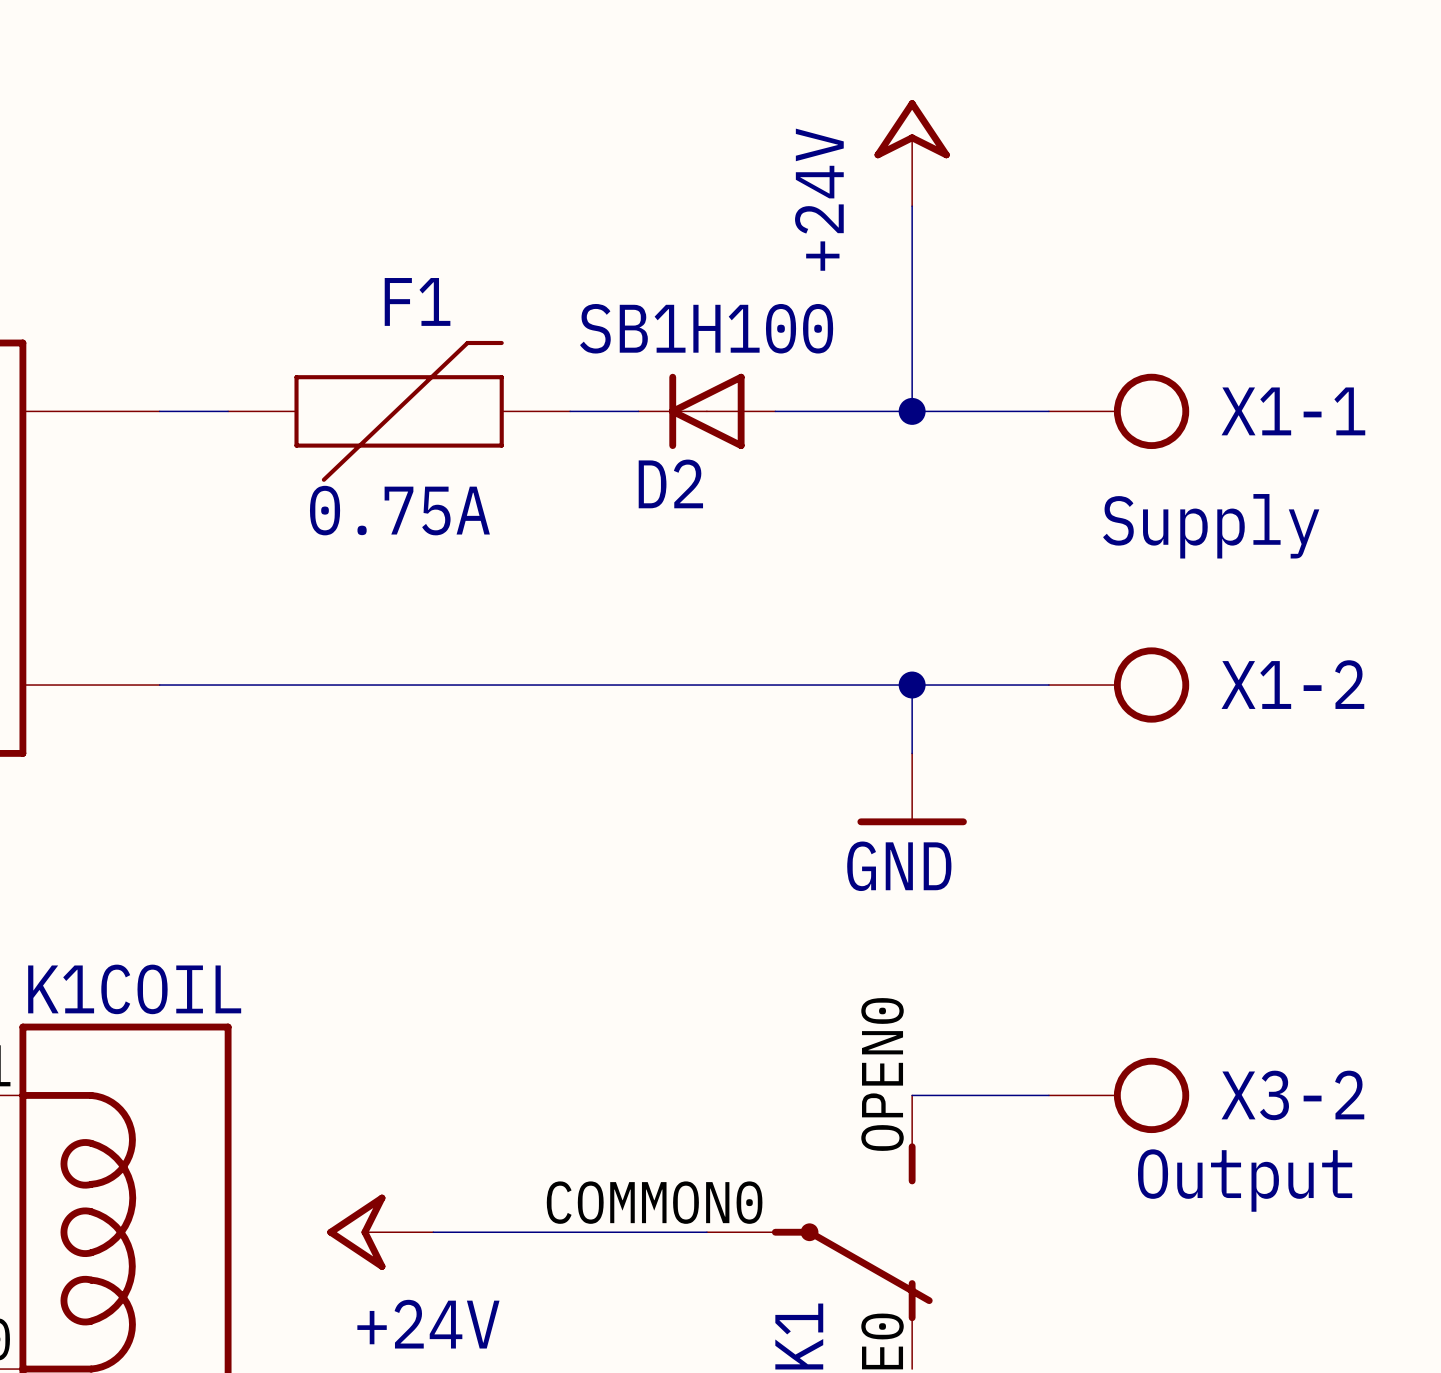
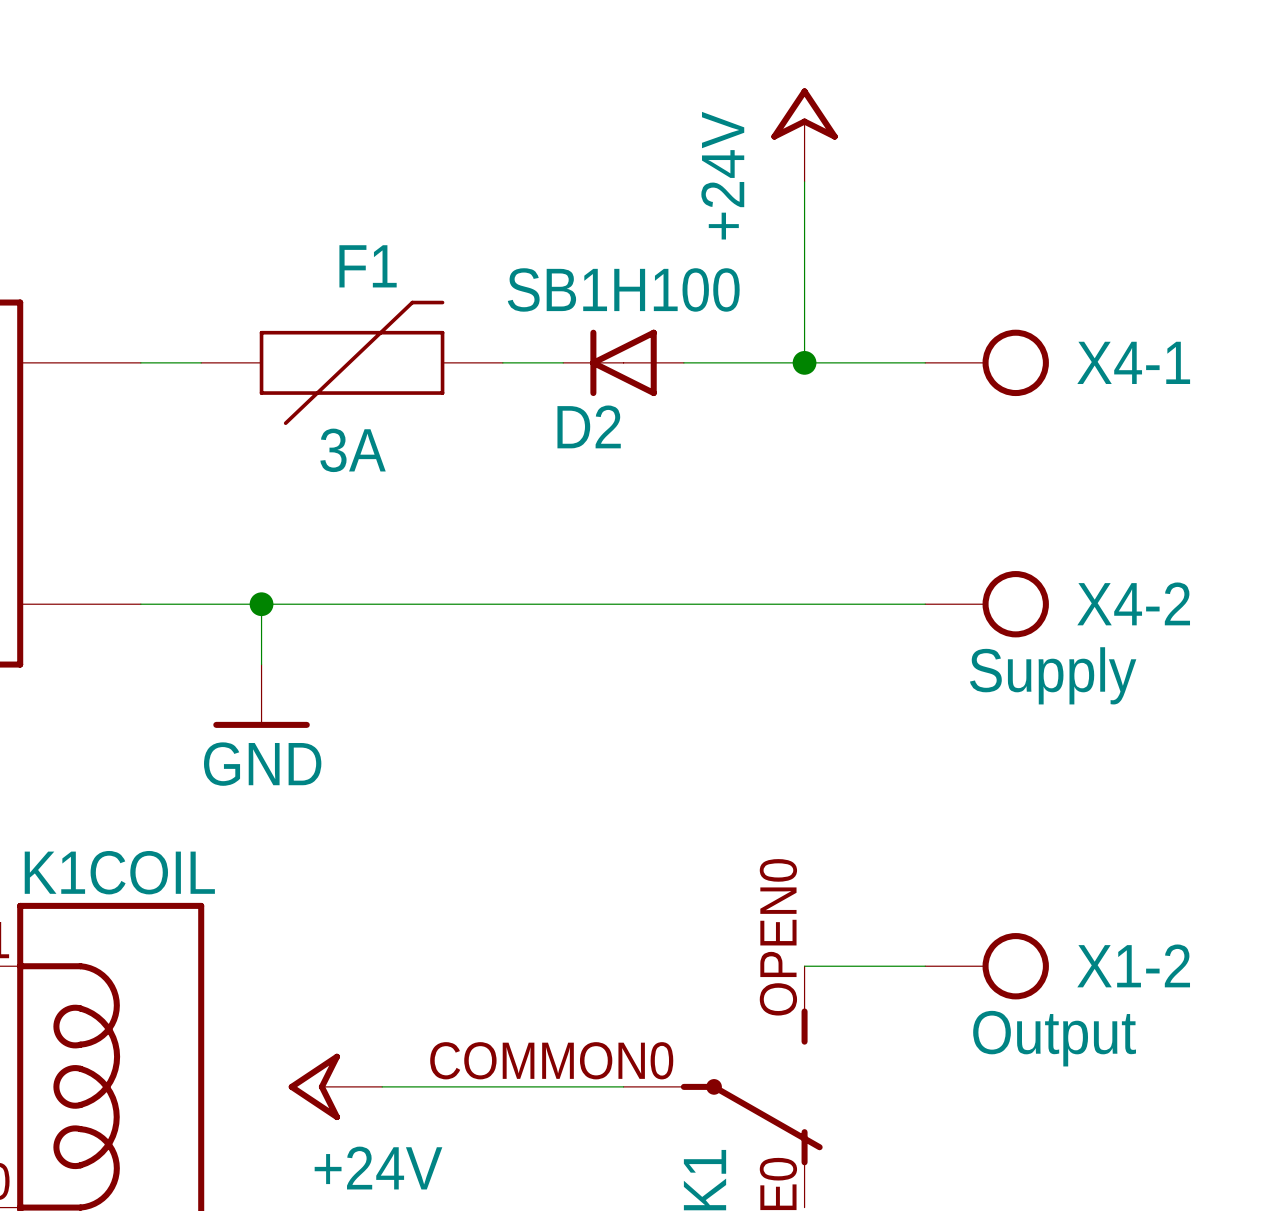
X1-1 name: X1-1 (1293, 411) -> X4-1 (1133, 362)
F1 value: 0.75A (399, 510) -> 3A (353, 450)
X1-1 value: Supply (1211, 526) -> none
X1-2 name: X1-2 (1292, 684) -> X4-2 (1133, 603)
junction: none -> (261, 604)
wire: (912, 685) (912, 753) -> (261, 604) (261, 664)
junction: (912, 685) -> none
X1-2 value: none -> Supply (1053, 675)
power symbol position: GND (912, 789) -> GND (261, 696)
X3-2 name: X3-2 (1292, 1095) -> X1-2 (1133, 965)
X3-2 value: none -> Output (1054, 1038)
text: Output (1245, 1180) -> none

